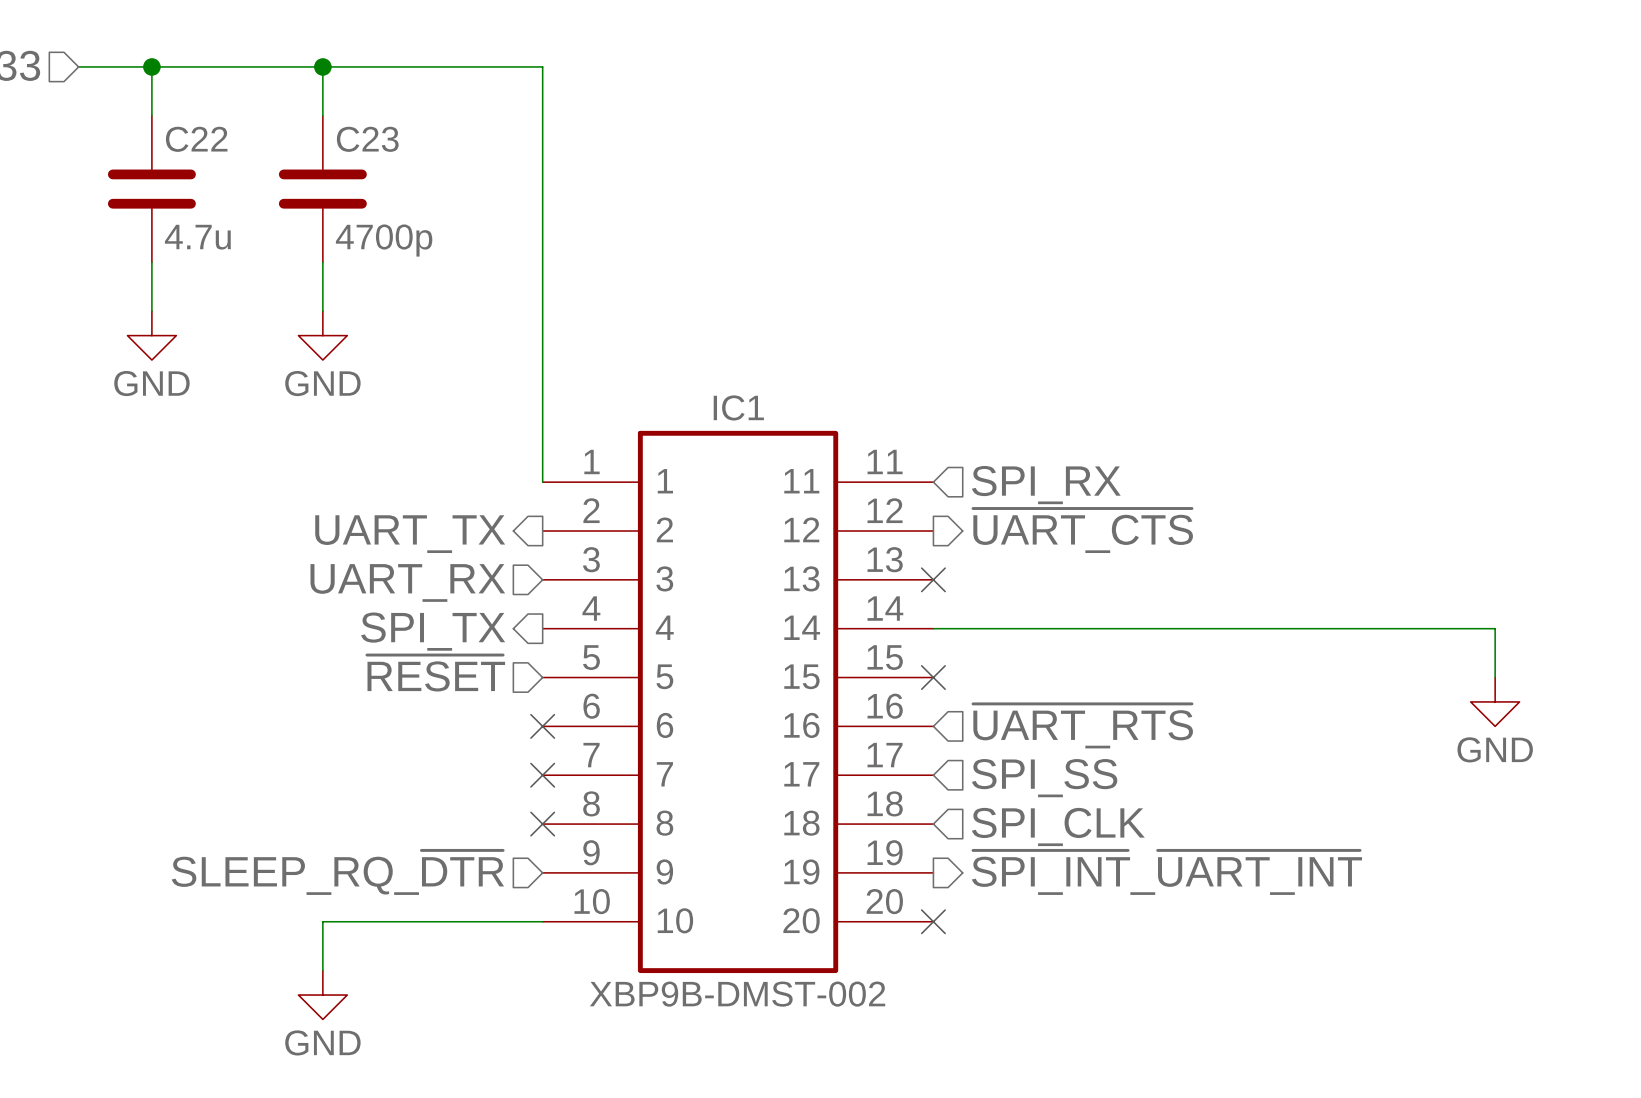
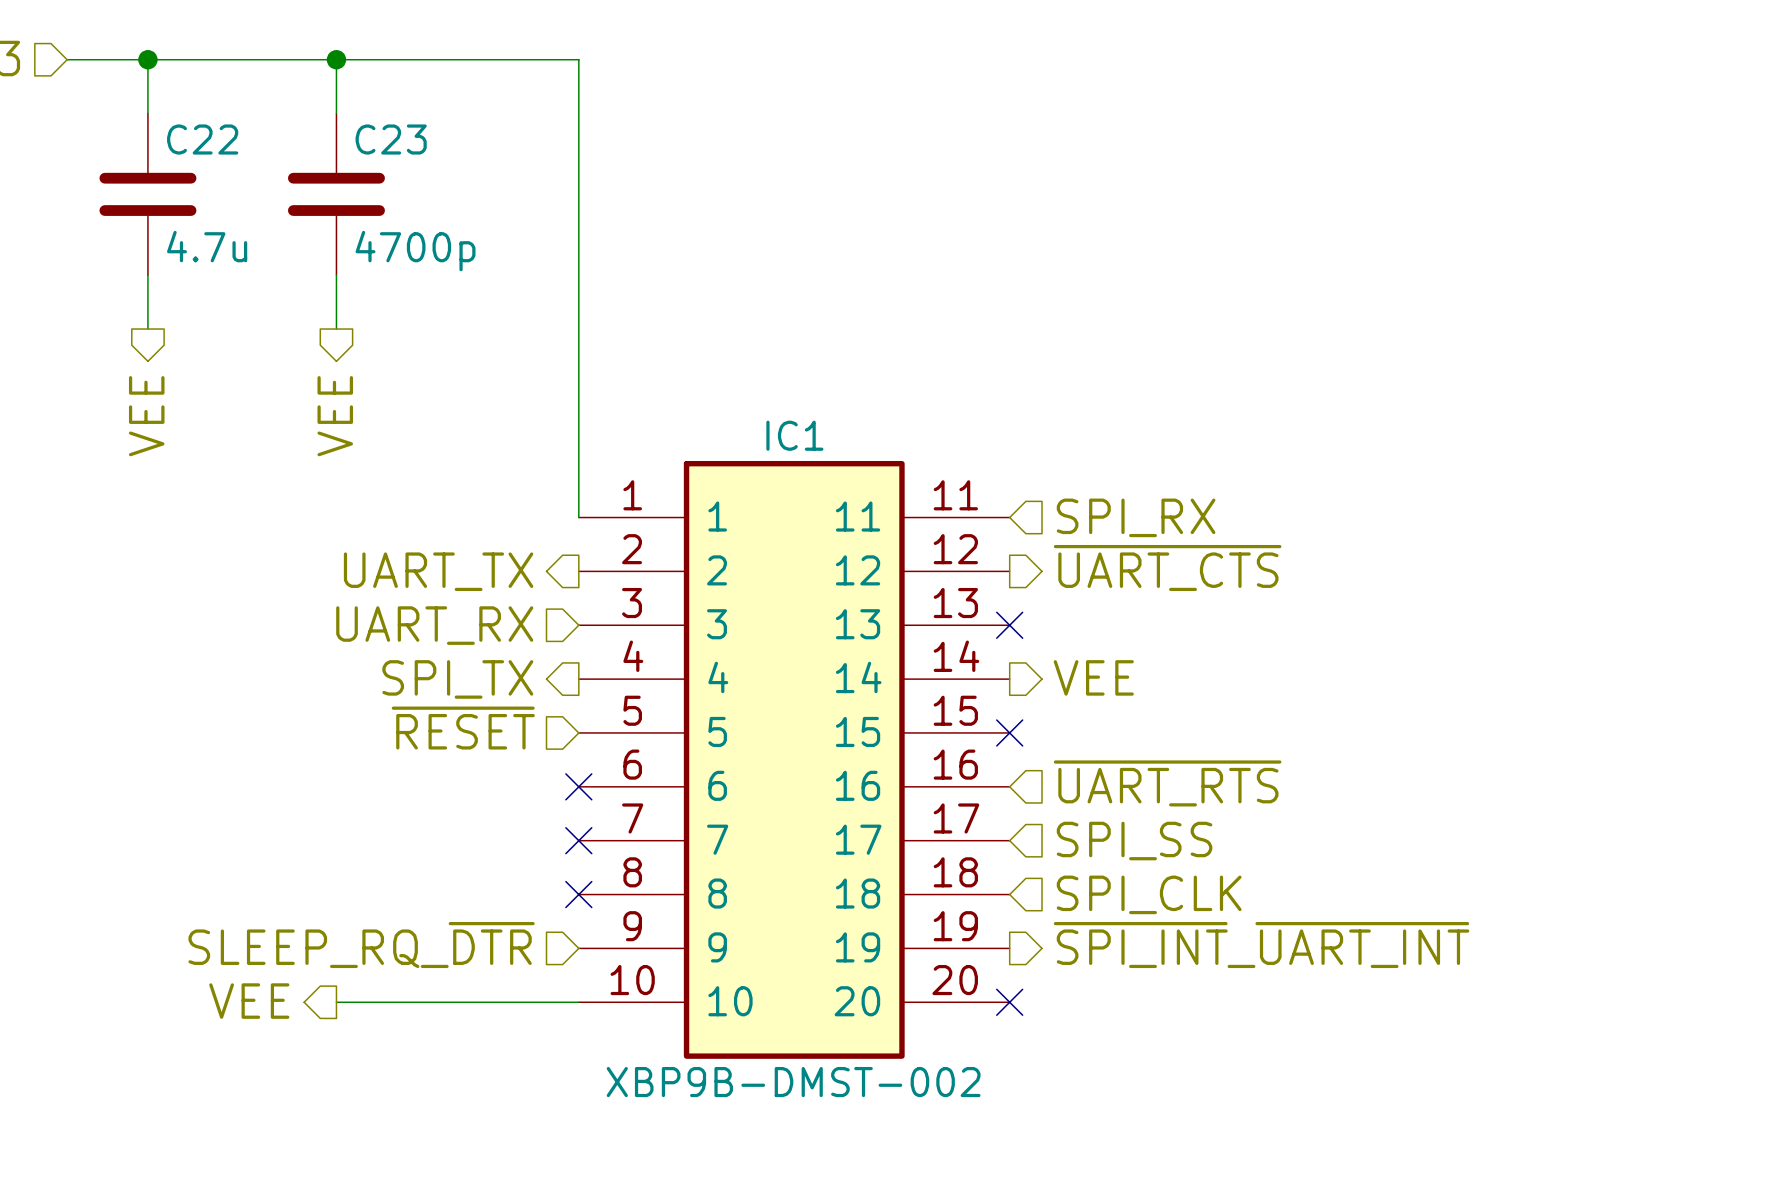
power symbol: GND (151, 335) -> none
power symbol: GND (322, 335) -> none
hierarchical label: none -> VEE (146, 416)
hierarchical label: none -> VEE (335, 416)
hierarchical label: none -> VEE (1093, 677)
wire: (933, 628) (1495, 628) (1495, 677) -> none
power symbol: GND (1495, 701) -> none
hierarchical label: none -> VEE (249, 1001)
wire: (322, 921) (322, 970) -> none
power symbol: GND (322, 995) -> none

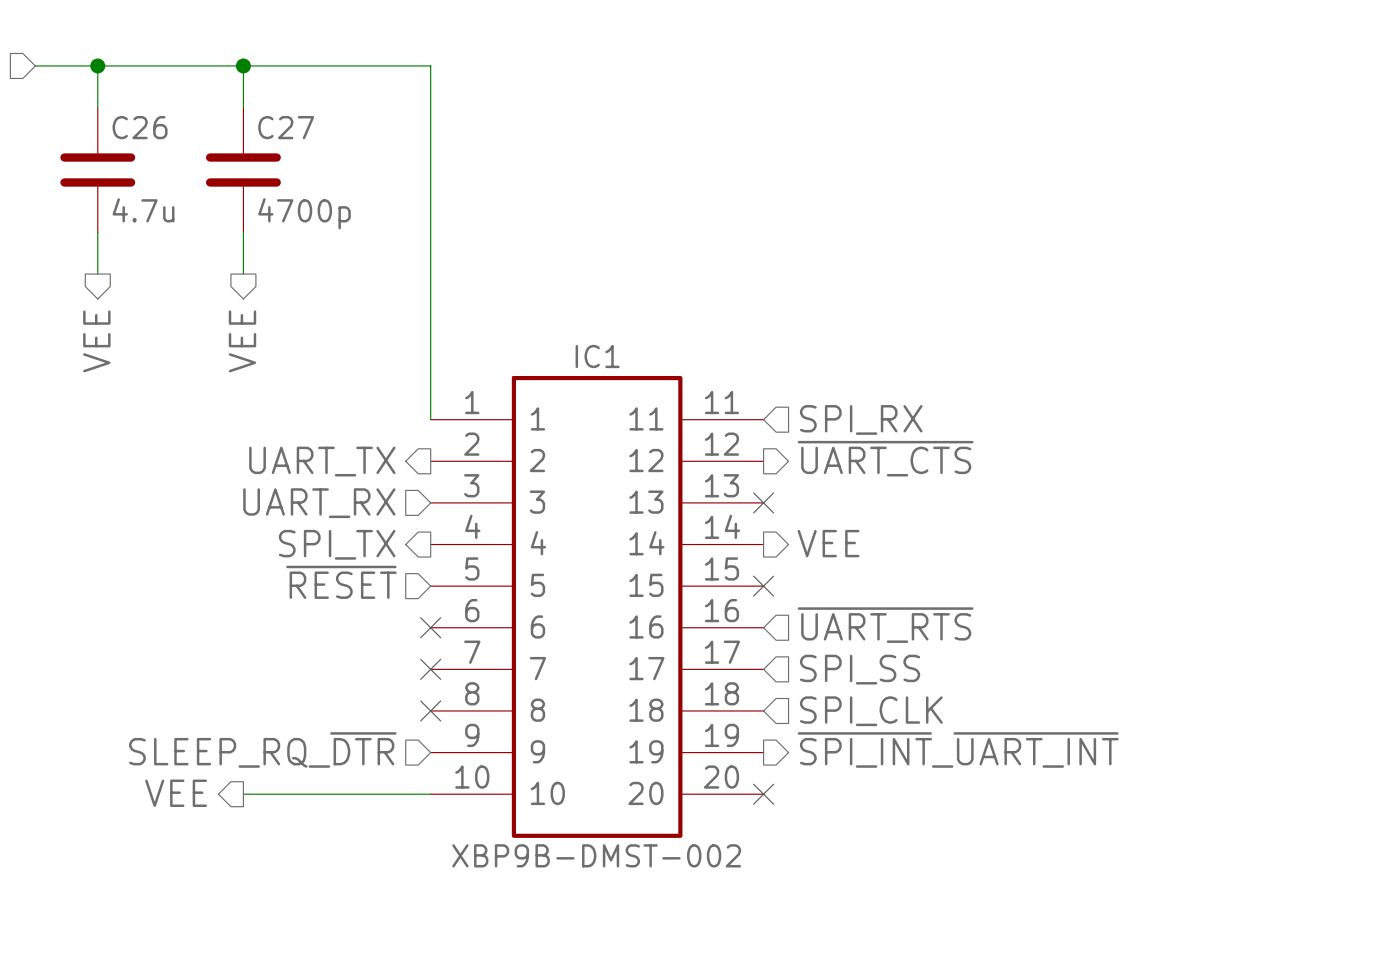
C22 name: C22 (202, 139) -> C26 (140, 127)
C23 name: C23 (391, 139) -> C27 (286, 127)

